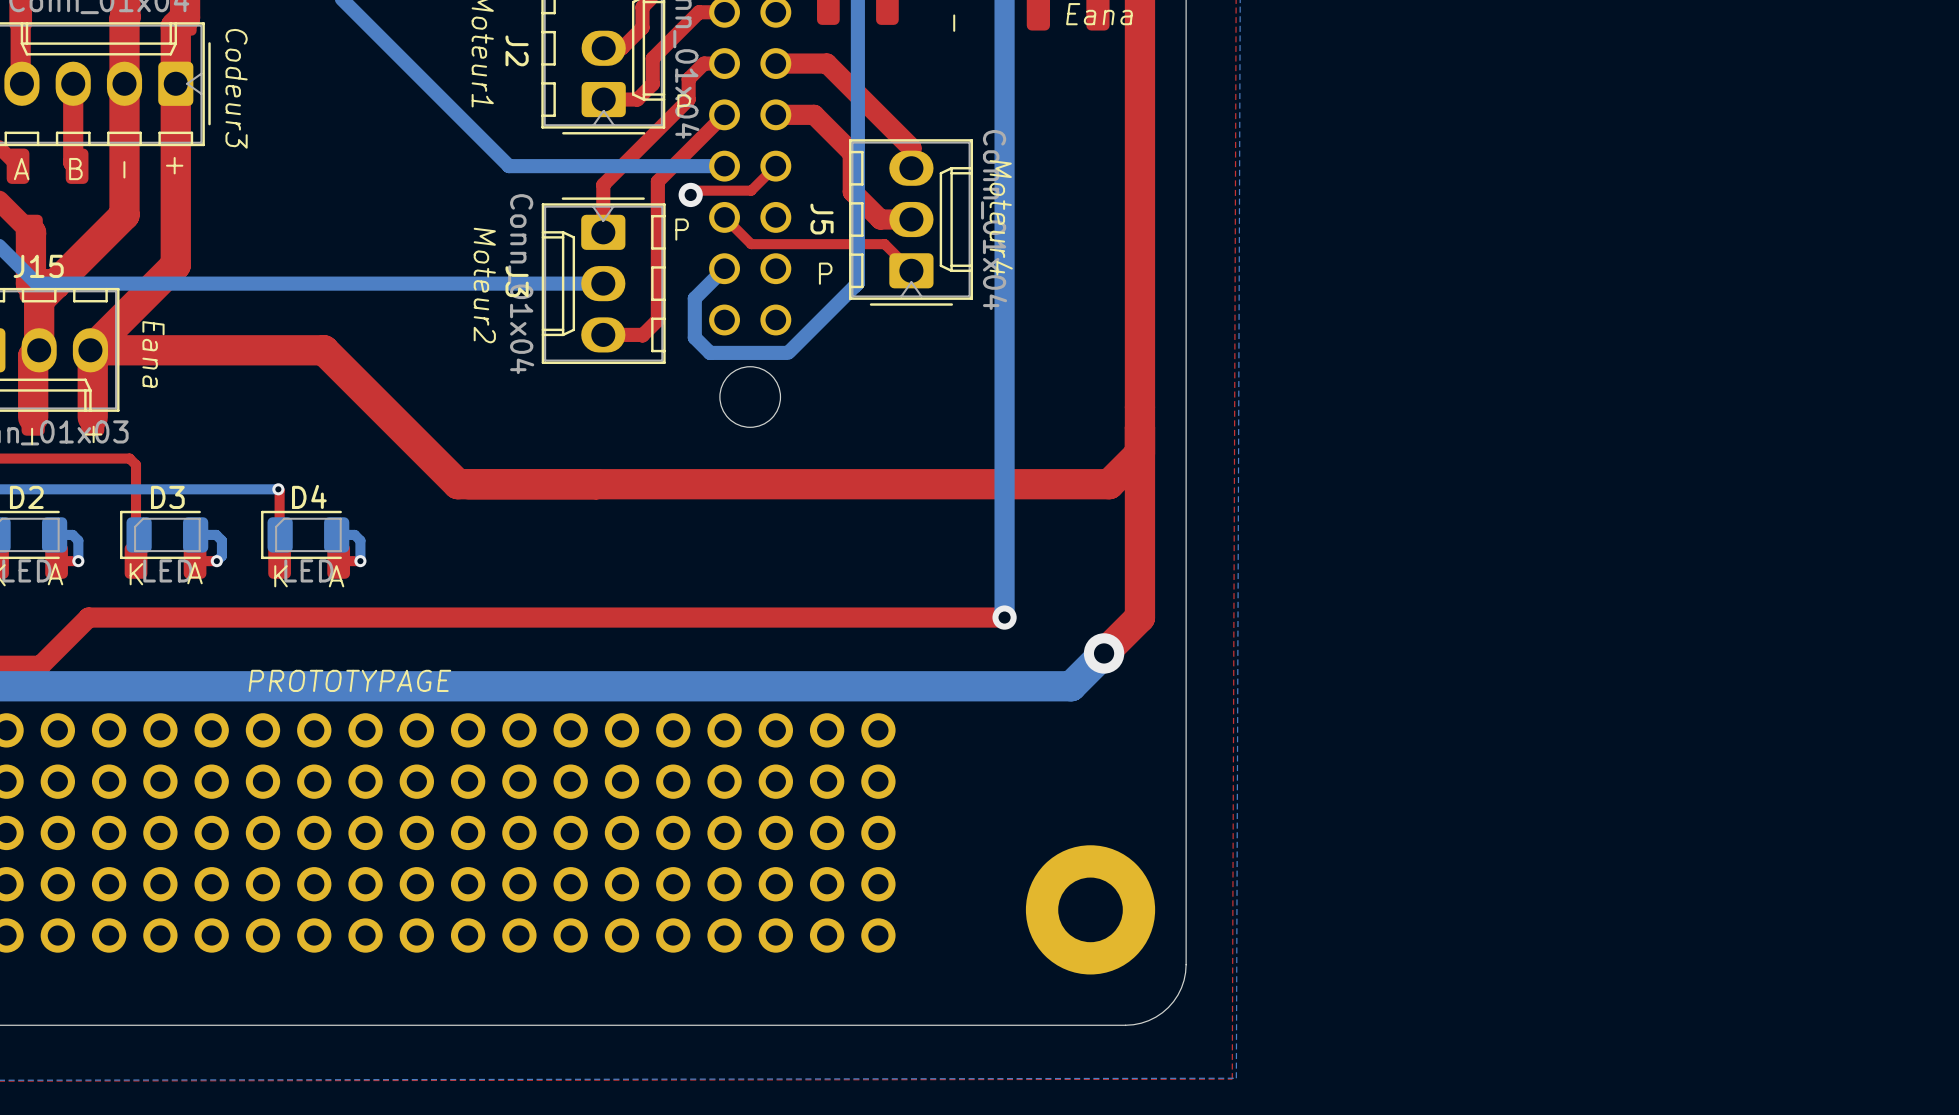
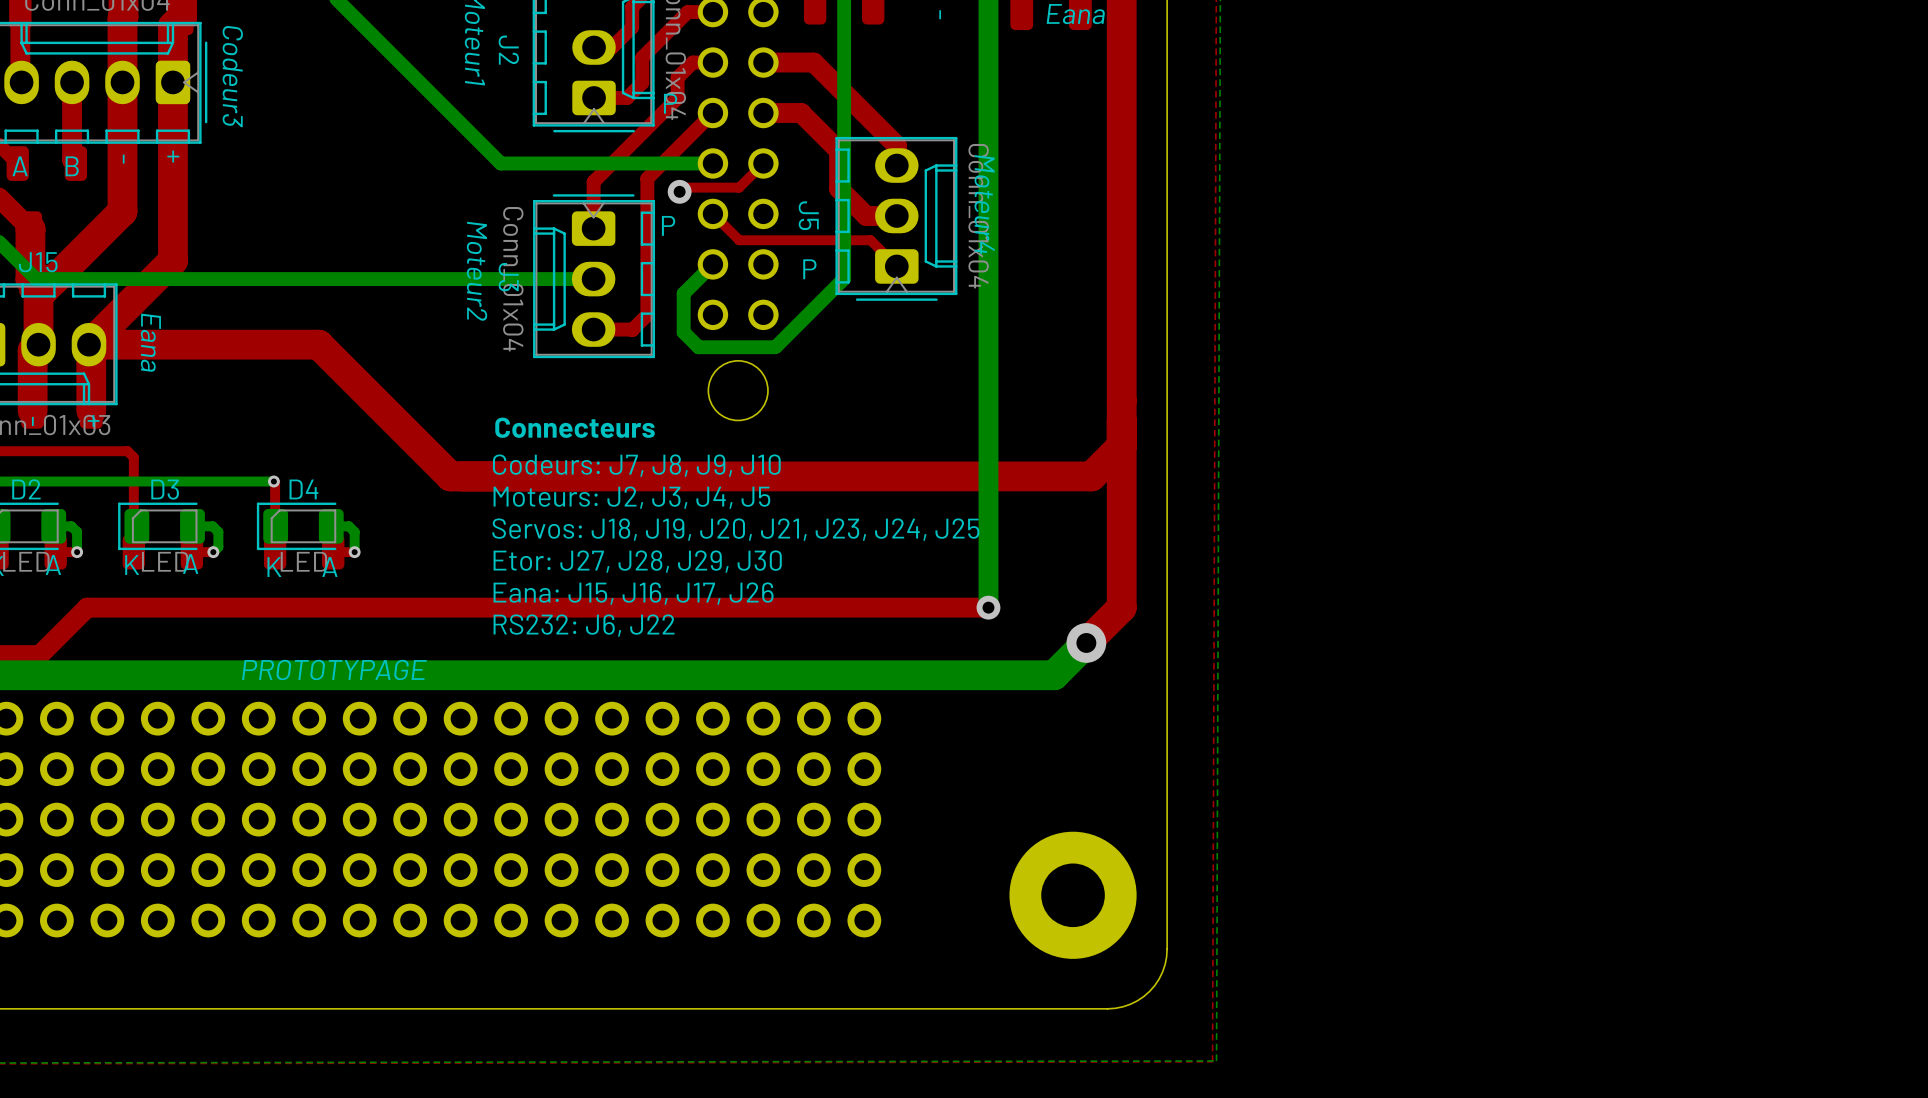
text: none -> Connecteurs (575, 427)
text: none -> Codeurs: J7, J8, J9, J10 (636, 465)
text: none -> Moteurs: J2, J3, J4, J5 (631, 497)
text: none -> Servos: J18, J19, J20, J21, J23, J24, J25 (735, 529)
text: none -> Etor: J27, J28, J29, J30 (637, 561)
text: none -> Eana: J15, J16, J17, J26 (633, 593)
text: none -> RS232: J6, J22 (584, 625)

